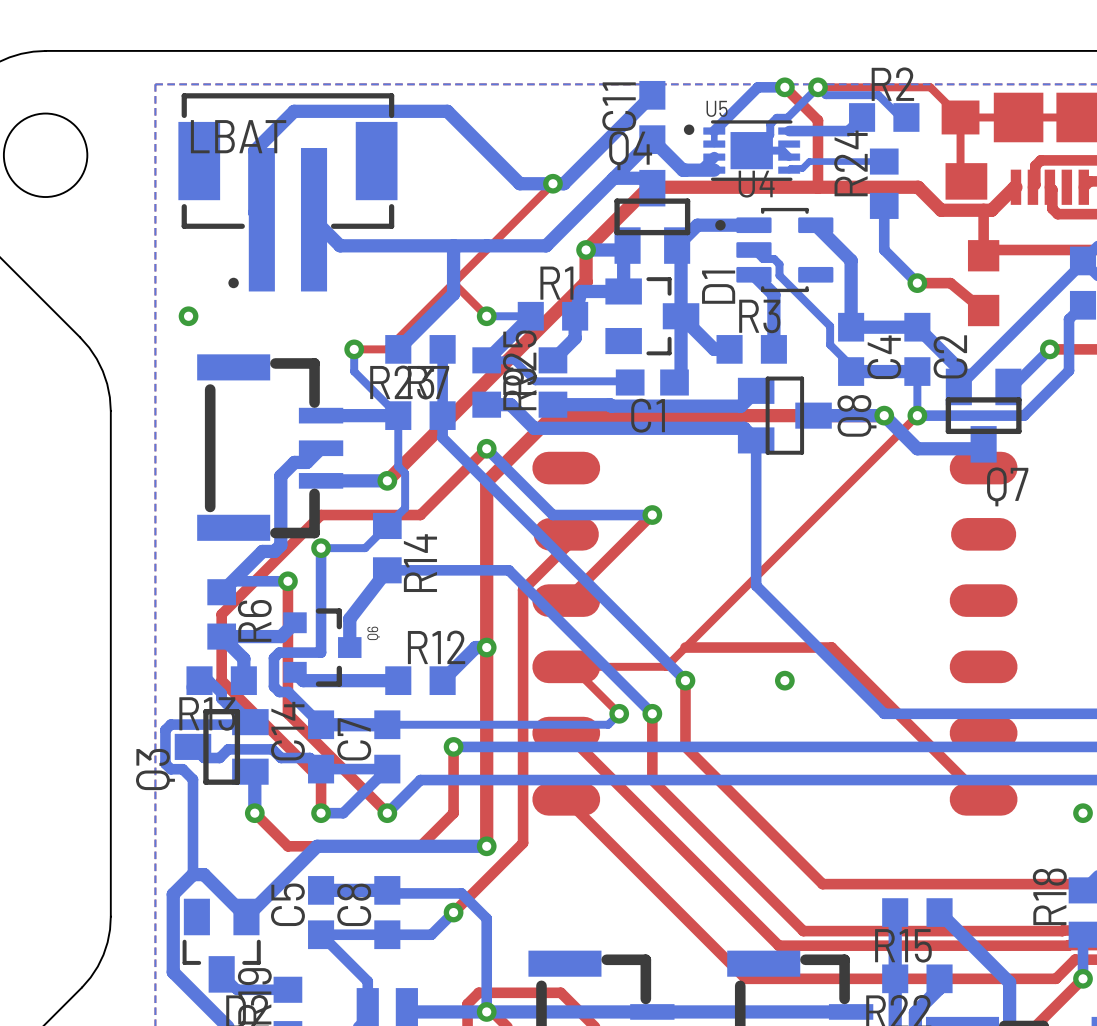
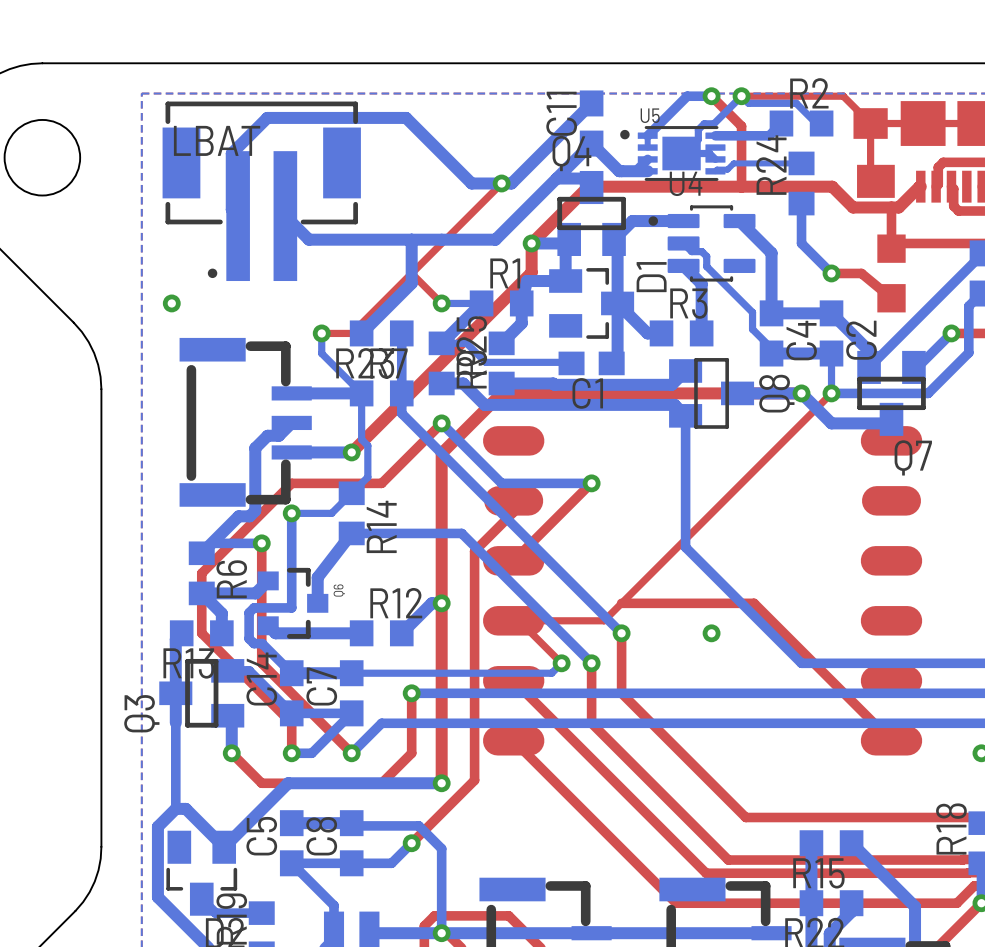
bottom track: (199, 680) (208, 680) (221, 693) (221, 698) (226, 704) (232, 704) (250, 722) (247, 724) (170, 724) (165, 730) (165, 763) (170, 769) (182, 769) (192, 779) -> (175, 639) (175, 722)
bottom track: (192, 746) (204, 758) (219, 758) (228, 749) (272, 749) (281, 758) (309, 758) -> (227, 670) (249, 670) (281, 703)

